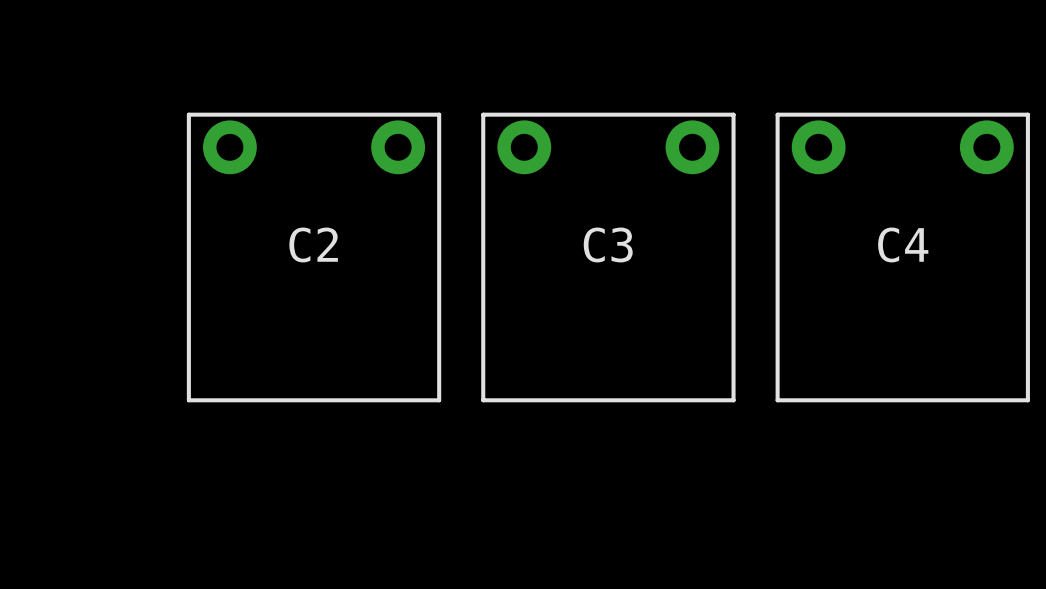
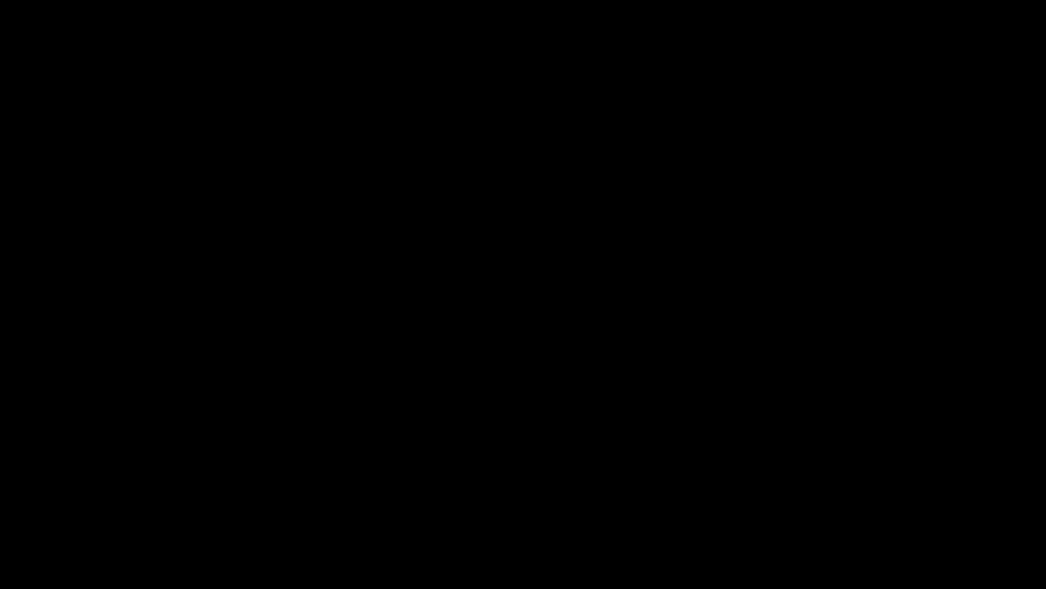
C2: (314, 257) -> none
C3: (608, 257) -> none
C4: (902, 257) -> none

